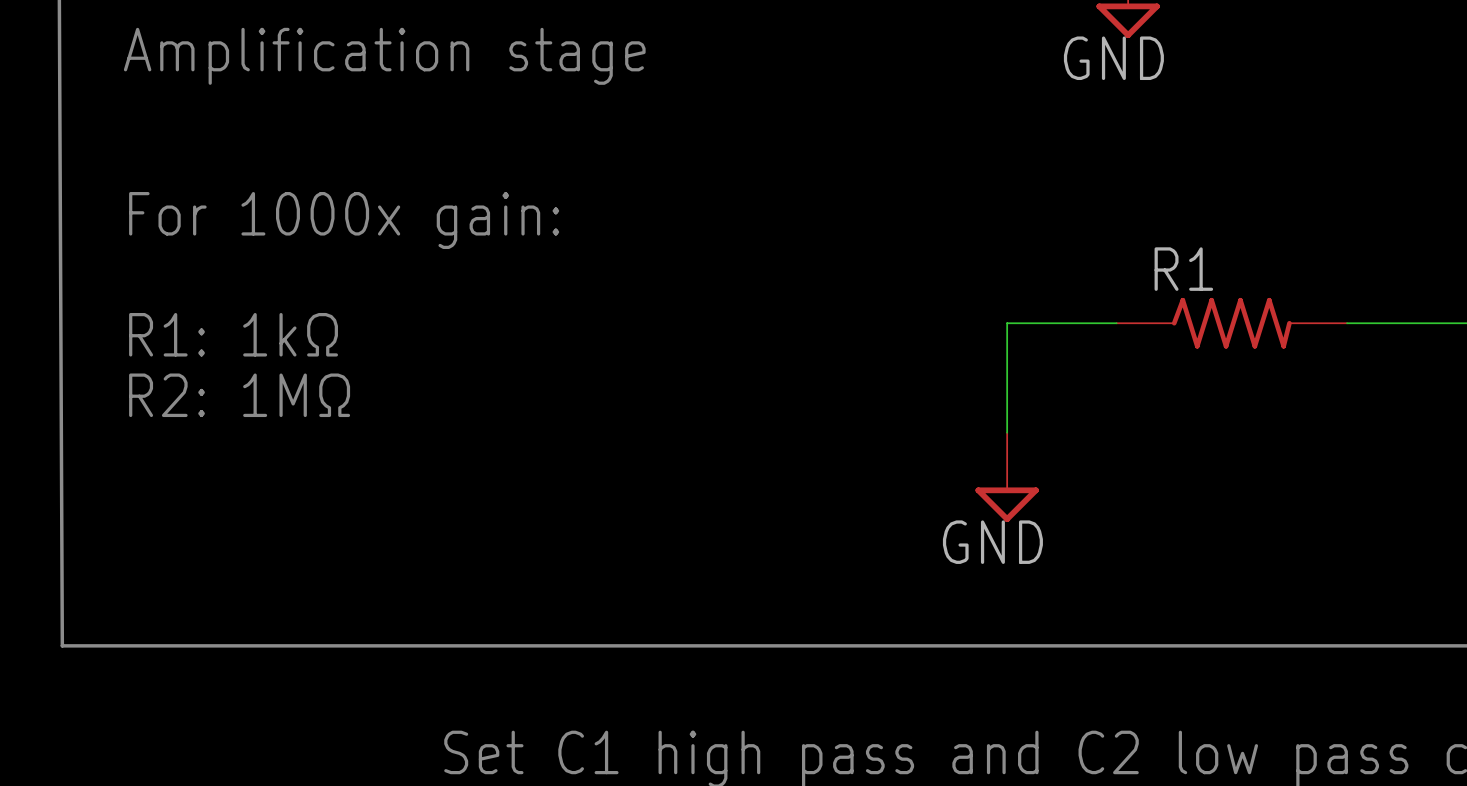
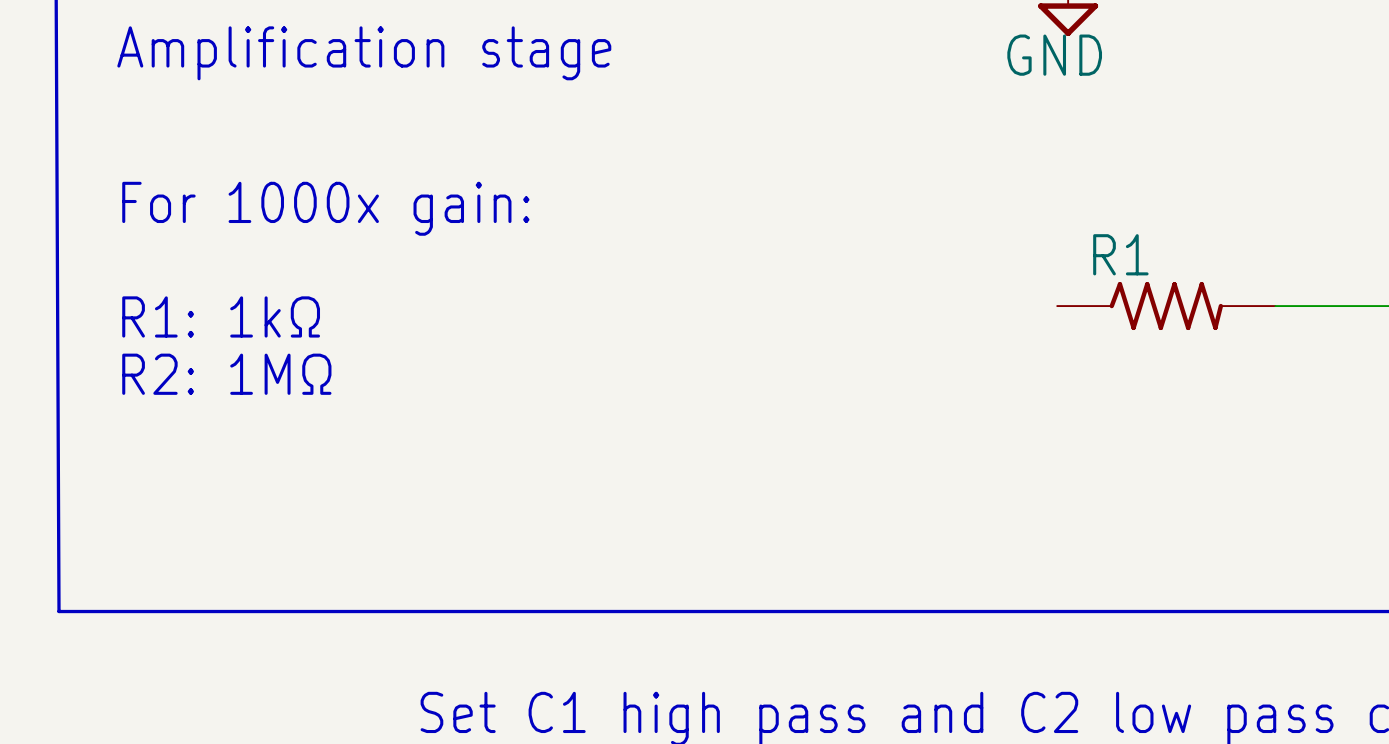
wire: (1116, 323) (1007, 323) (1007, 432) -> none
power symbol: GND (1007, 477) -> none

